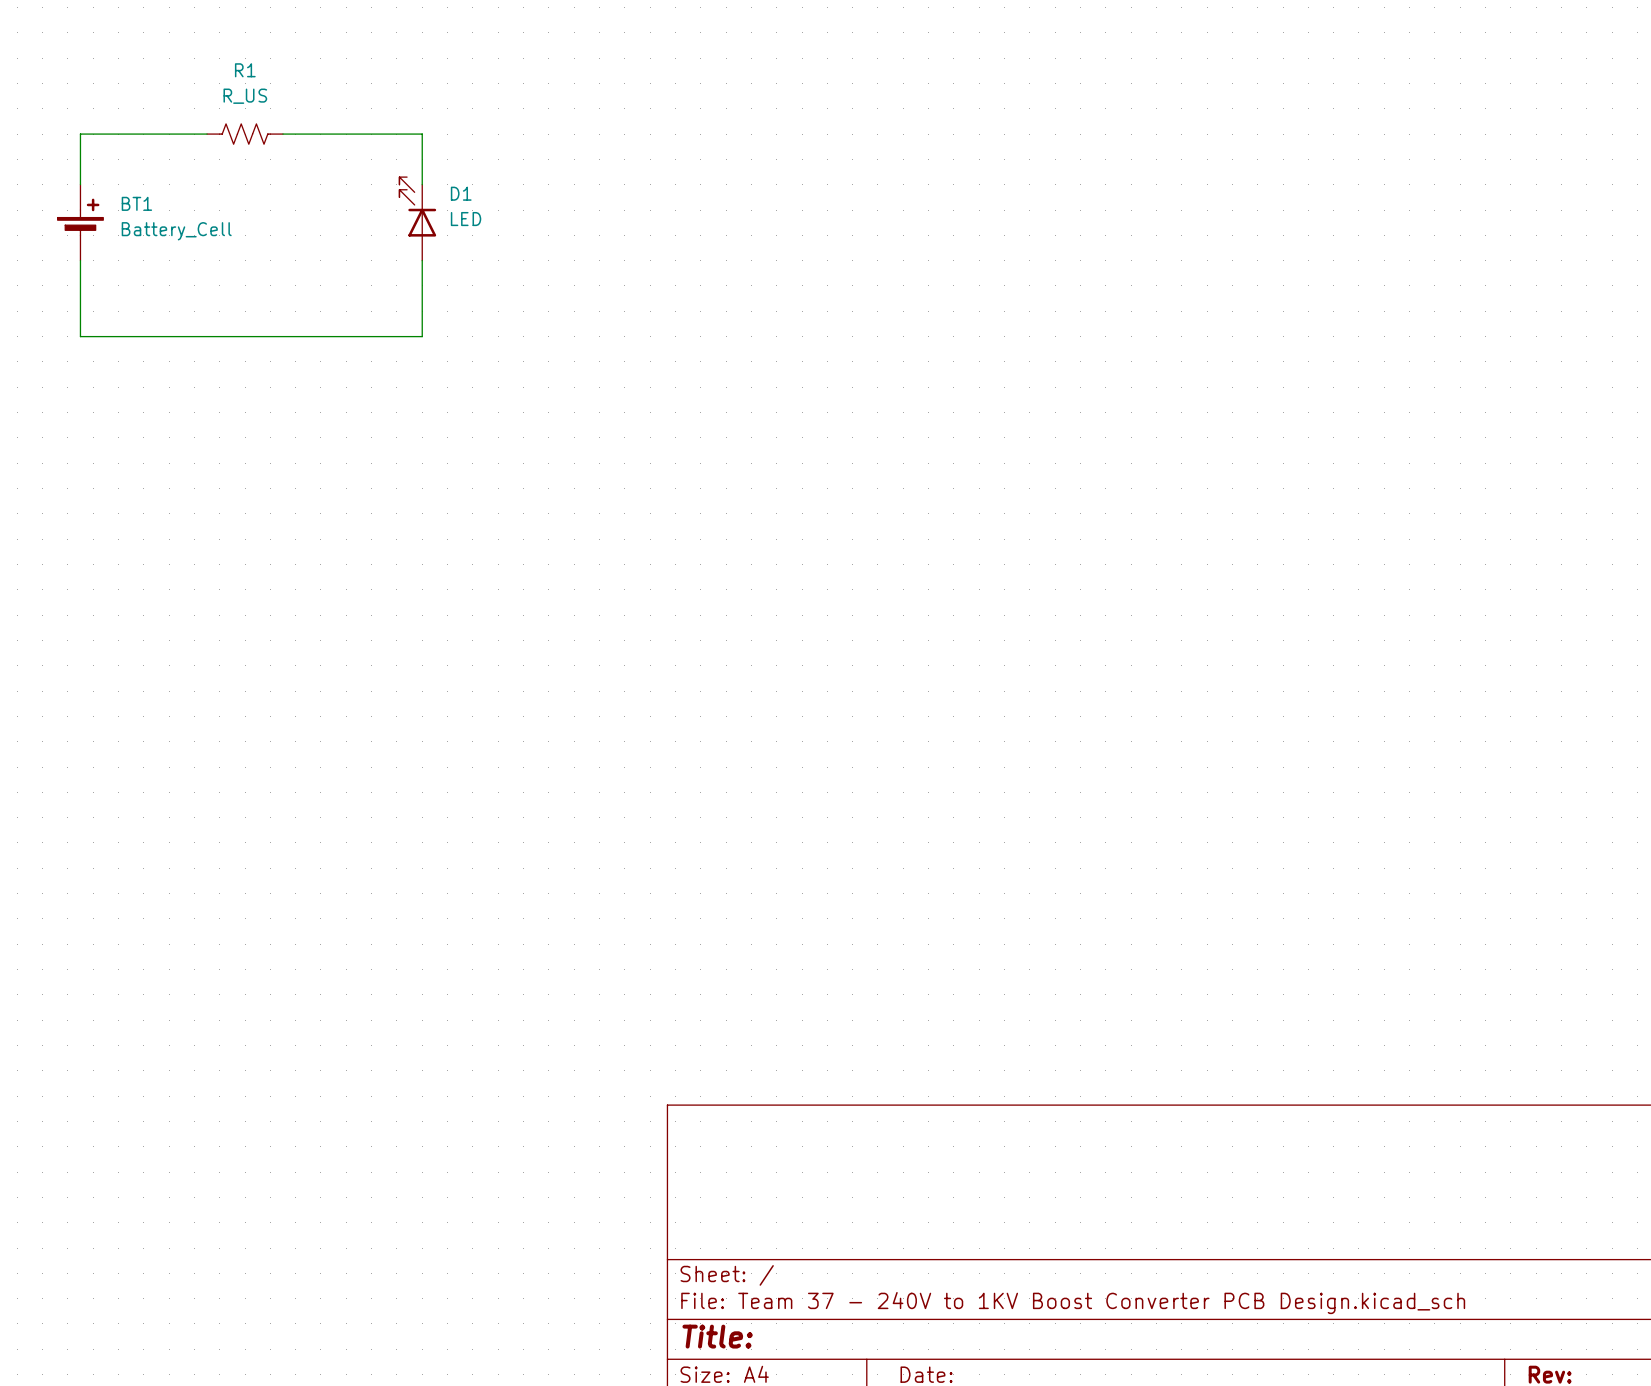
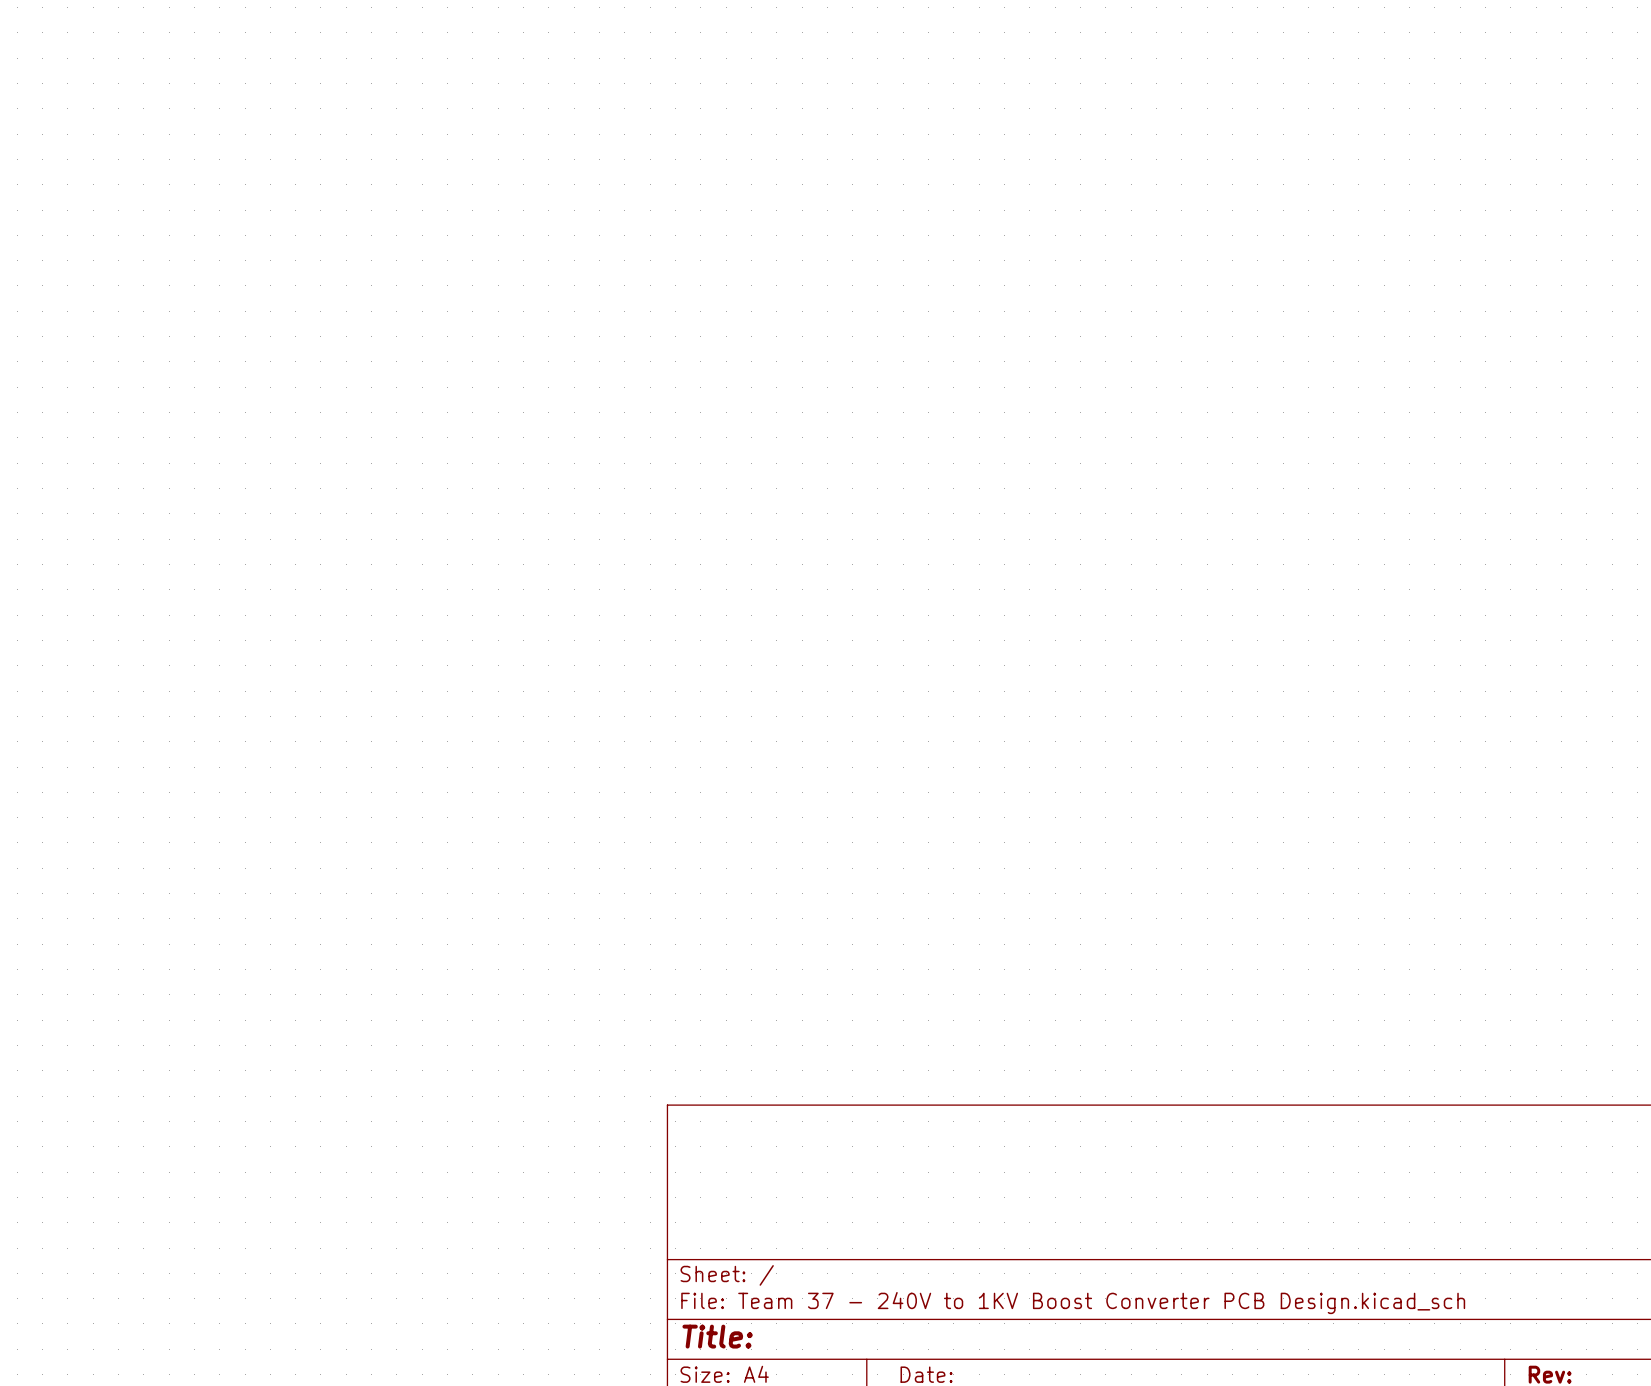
wire: (207, 134) (80, 134) (80, 184) -> none
R1: R_US (245, 134) -> none
wire: (282, 134) (422, 134) (422, 184) -> none
D1: LED (417, 218) -> none
BT1: Battery_Cell (80, 222) -> none
wire: (80, 260) (80, 336) (422, 336) (422, 260) -> none

